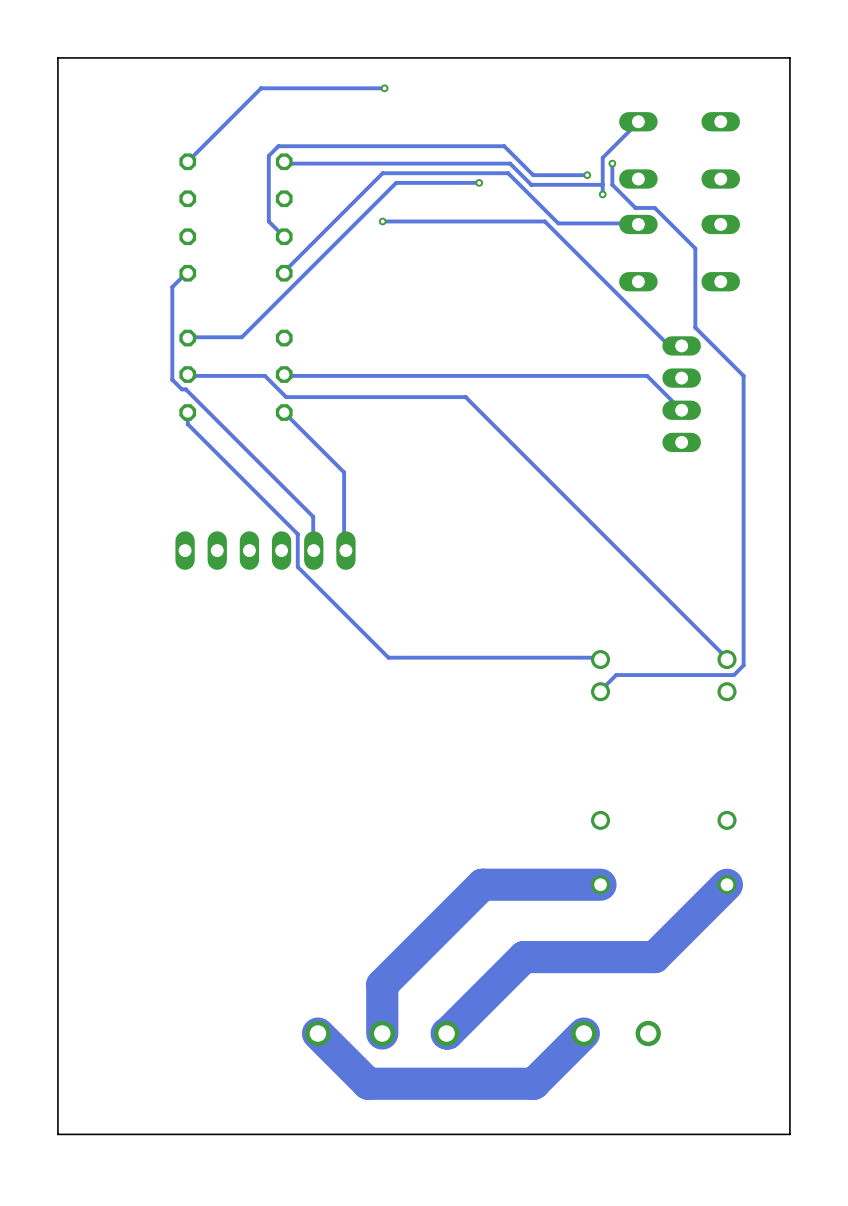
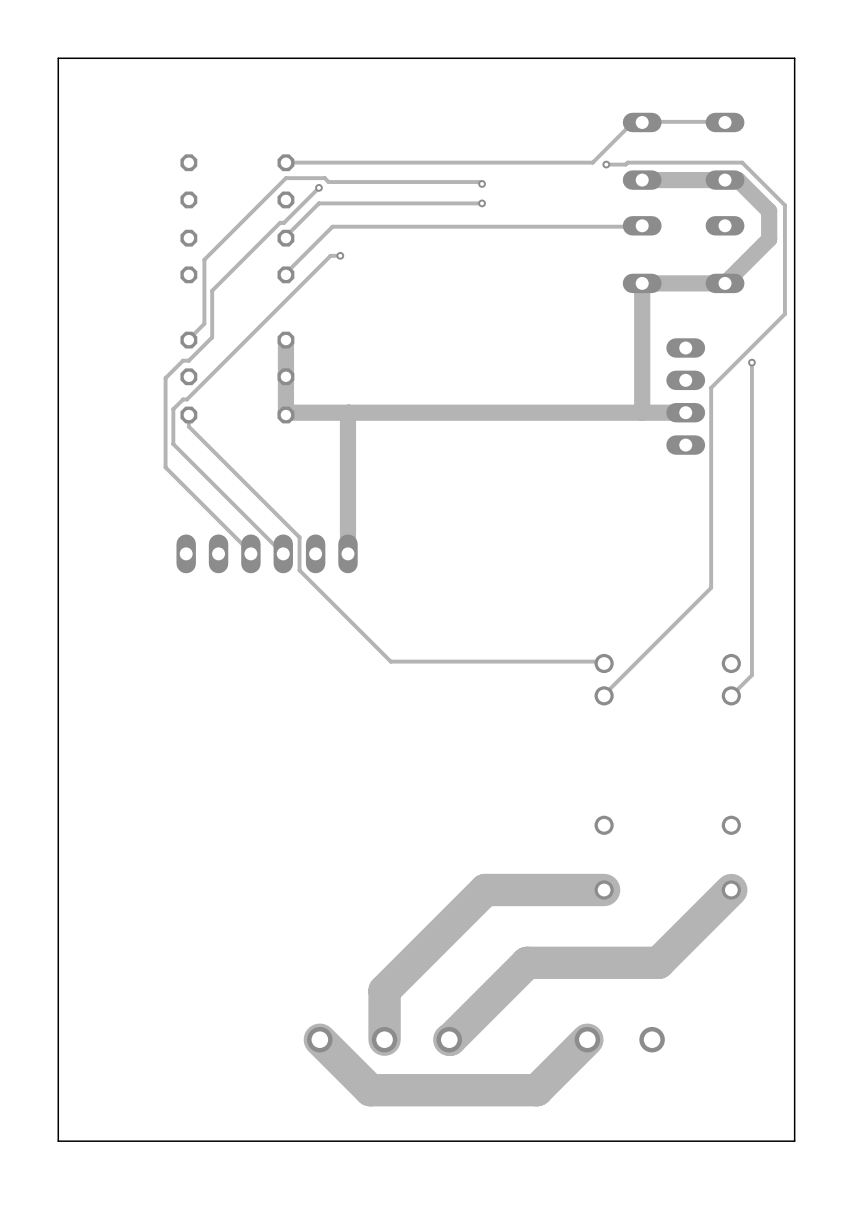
track: (384, 88) (261, 88) (187, 161) -> none
via: (384, 88) -> none
track: none -> (725, 122) (642, 122)
track: (637, 123) (602, 157) (602, 194) -> none
track: (284, 161) (284, 163) (510, 163) (531, 184) (602, 184) -> (285, 162) (592, 162) (631, 123) (641, 123)
via: none -> (606, 164)
track: (612, 163) (612, 184) (635, 207) (654, 207) (695, 248) (695, 327) (743, 375) (743, 665) (733, 675) (616, 675) -> (606, 164) (625, 164) (627, 162) (742, 162) (784, 205) (784, 314) (711, 387) (711, 587) (619, 679)
via: (612, 163) -> none
track: (587, 175) (533, 175) (504, 146) (278, 146) (268, 155) (268, 221) (284, 236) -> (482, 203) (318, 203) (285, 238)
via: (587, 175) -> none
track: none -> (642, 180) (738, 180) (769, 211) (769, 239) (725, 283) (642, 283) (641, 412)
track: (479, 182) (396, 182) (241, 337) (187, 337) -> (482, 182) (328, 182) (324, 178) (285, 178) (204, 259) (204, 323) (188, 339)
track: none -> (318, 187) (284, 222) (280, 222) (212, 290) (212, 337) (188, 360) (183, 360) (165, 378) (165, 467) (250, 553)
via: none -> (318, 187)
via: (602, 194) -> none
via: none -> (482, 203)
track: (382, 221) (544, 221) (668, 345) (681, 345) -> none
via: (382, 221) -> none
track: (638, 224) (558, 223) (508, 173) (382, 173) (330, 225) -> (642, 225) (332, 226)
track: none -> (340, 255) (330, 255) (186, 399) (183, 399) (173, 409) (173, 444) (283, 553)
via: none -> (340, 255)
track: (187, 273) (172, 287) (172, 379) (181, 389) (185, 389) (313, 516) (313, 550) -> none
track: none -> (751, 362) (751, 675) (731, 695)
via: none -> (751, 362)
track: (187, 374) (264, 375) (286, 397) (465, 397) (726, 659) -> none
track: (284, 374) (647, 375) (681, 410) -> (285, 340) (285, 415) (288, 412) (685, 412)
track: (284, 412) (344, 472) (344, 549) (345, 550) -> (348, 412) (347, 553)

